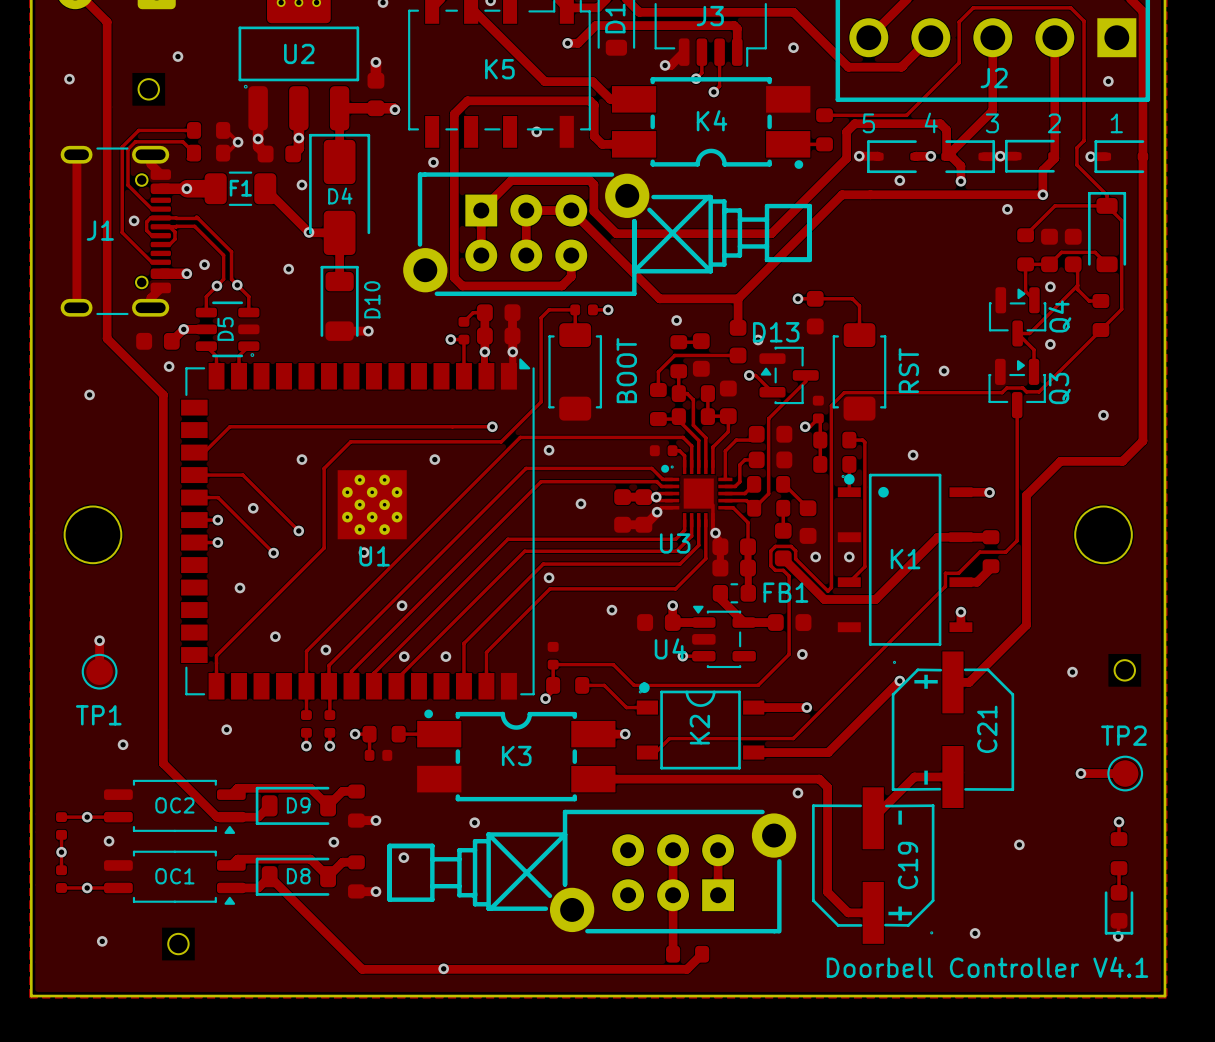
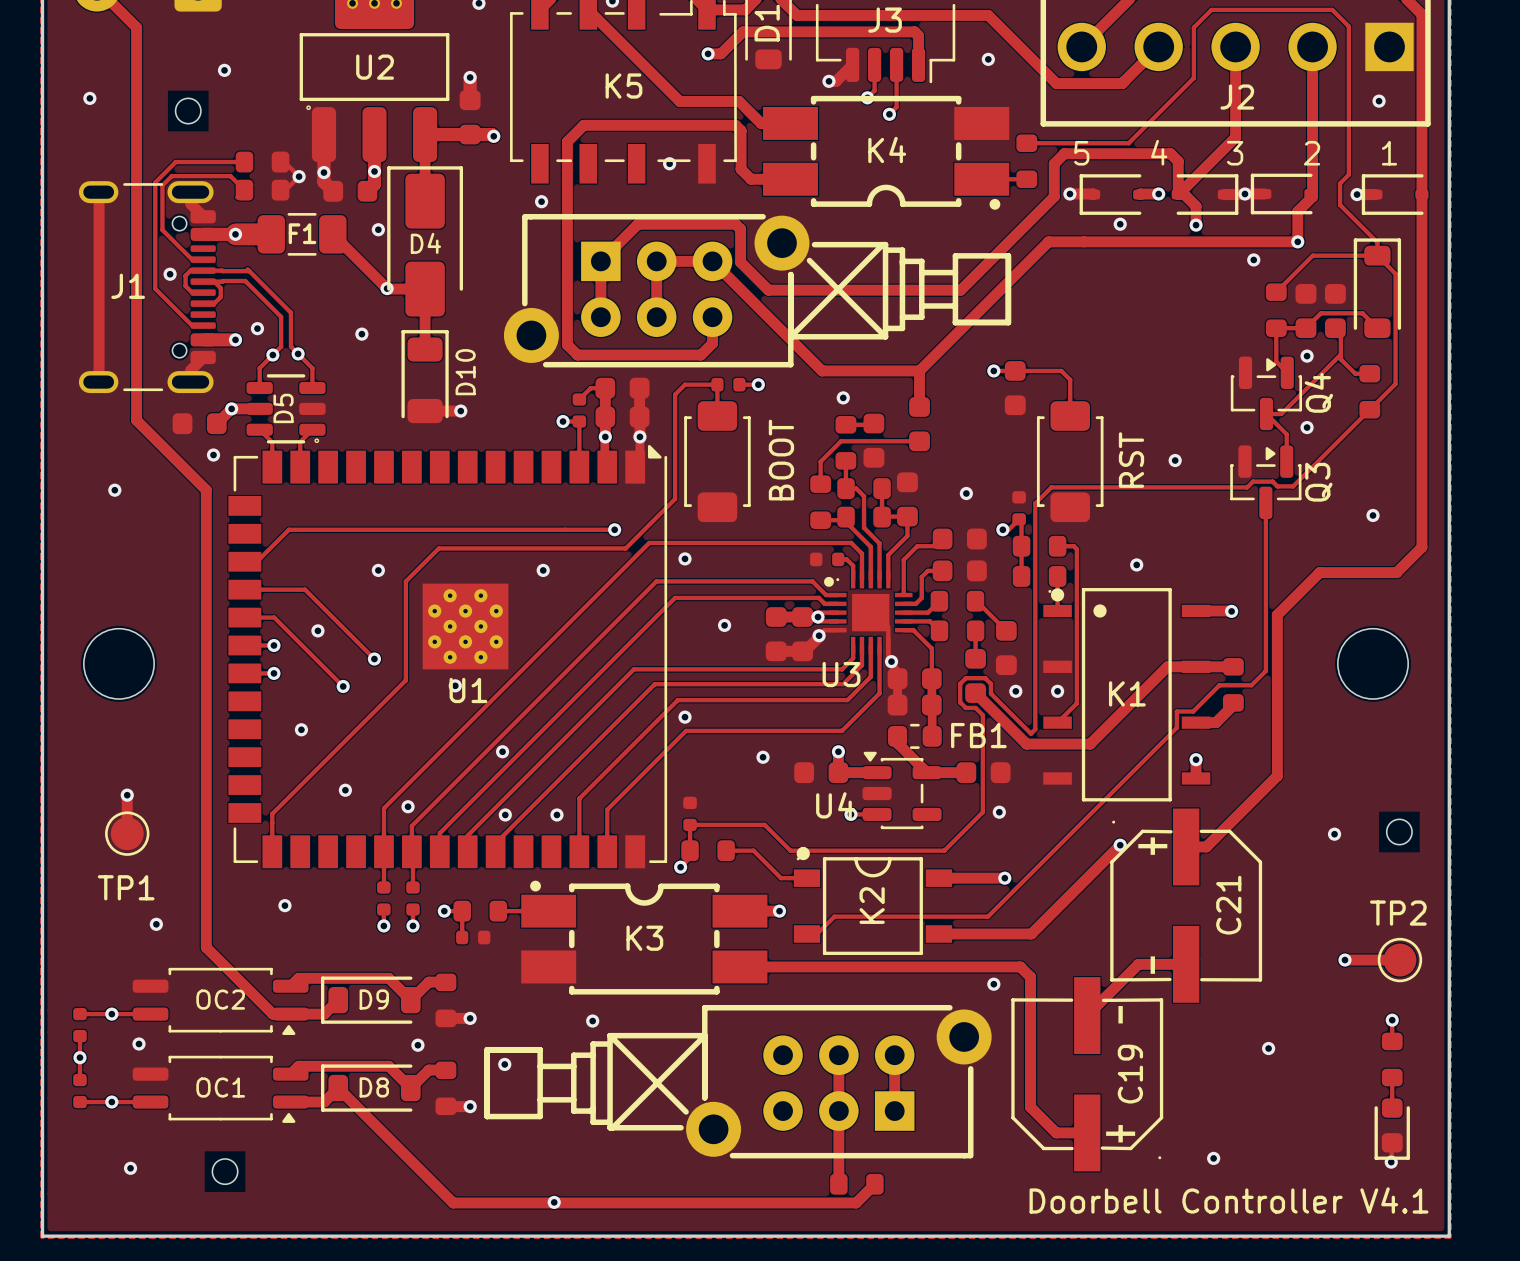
via: (758, 339) -> none
track: (749, 375) (755, 375) (772, 392) -> none
via: (749, 375) -> none
D13: (789, 375) -> none
track: (805, 375) (805, 381) (768, 418) (768, 493) (754, 508) -> none
via: none -> (966, 493)

